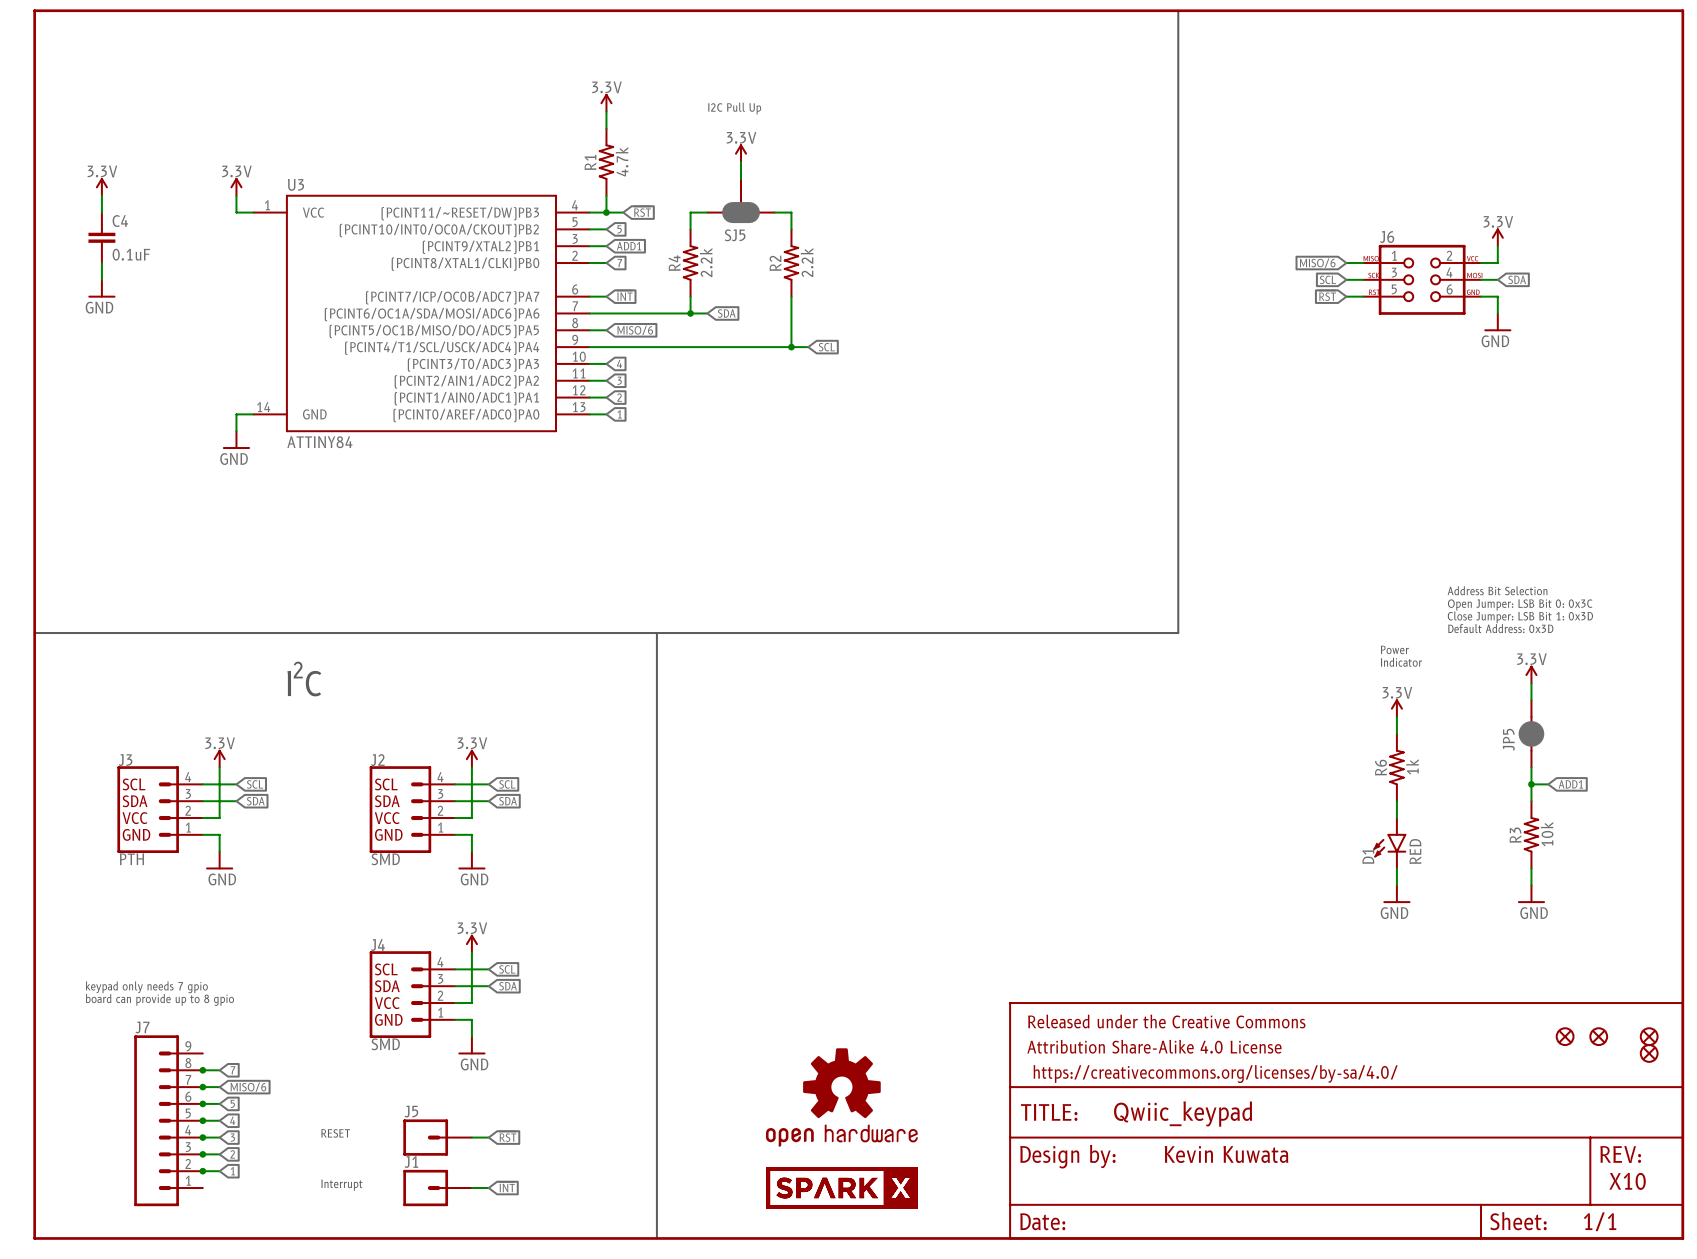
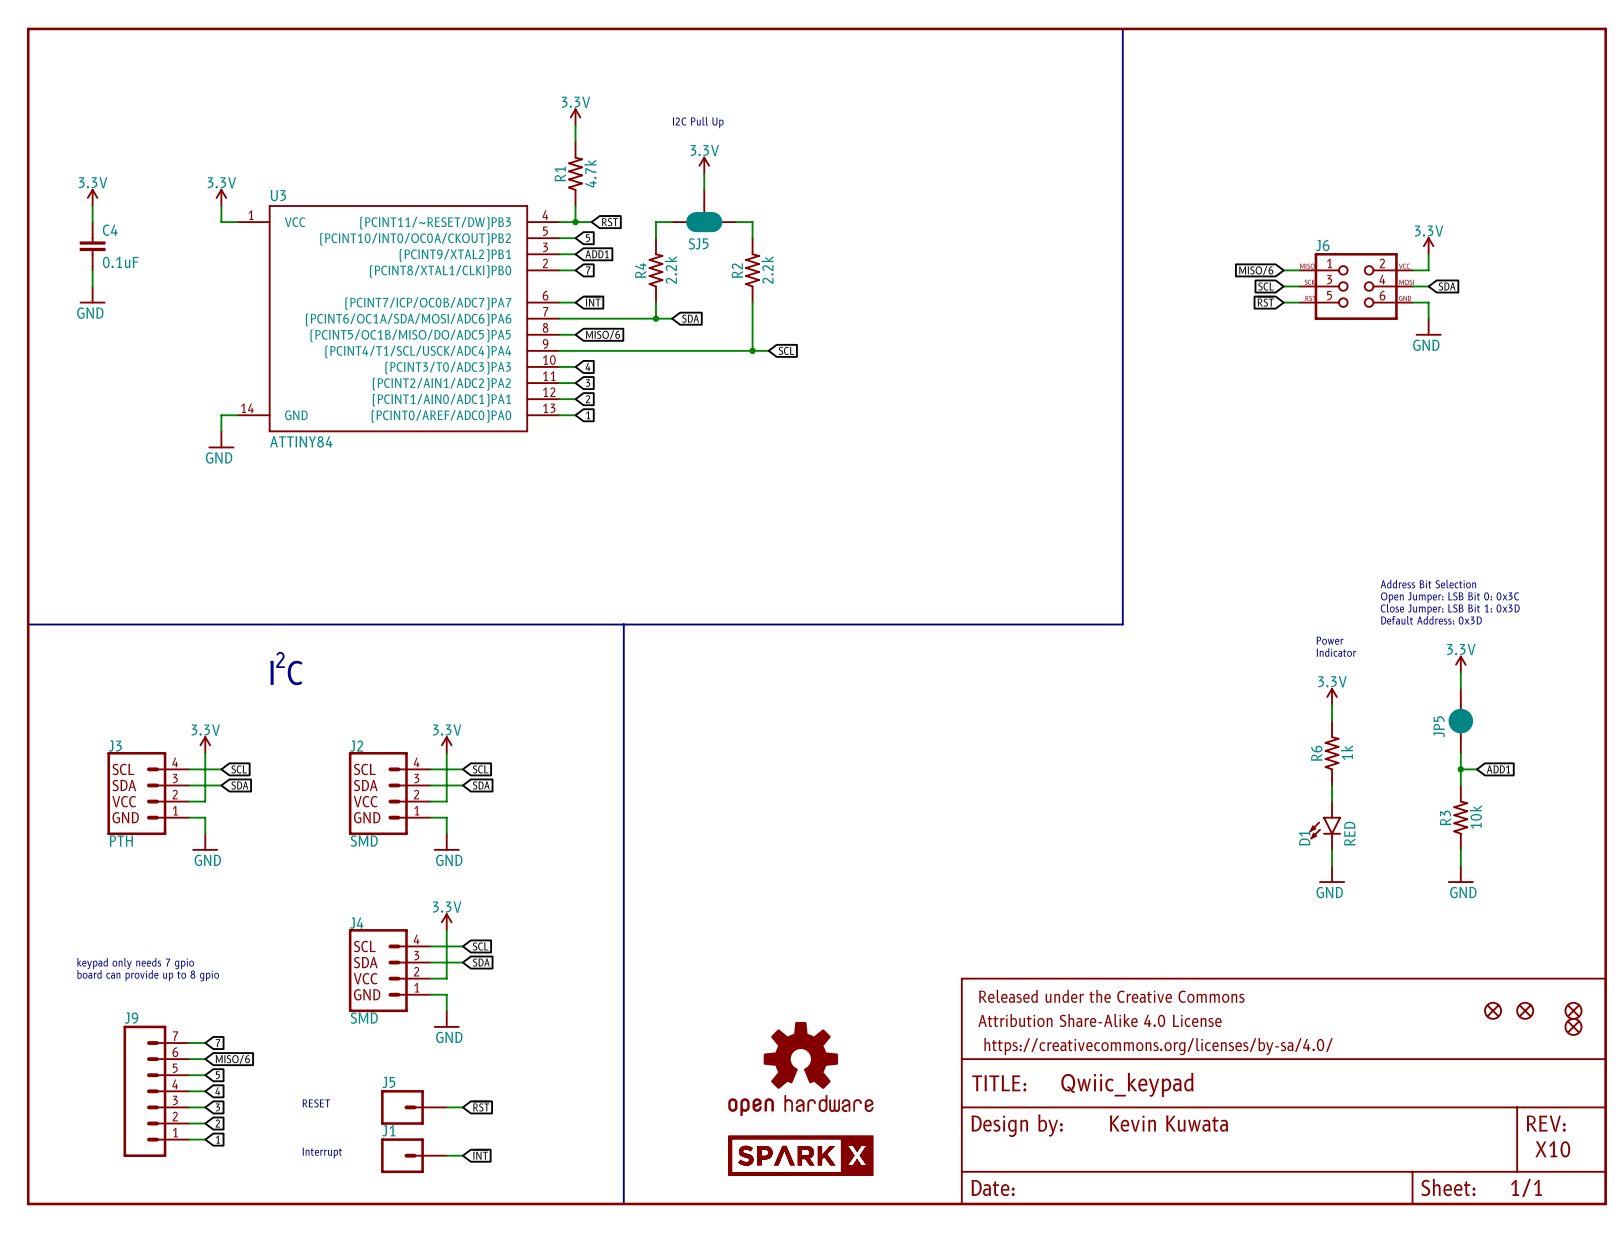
junction: (202, 1070) -> none
junction: (202, 1087) -> none
junction: (202, 1103) -> none
J7: (168, 1120) -> none
J9: none -> (156, 1091)
junction: (202, 1120) -> none
junction: (202, 1137) -> none
junction: (202, 1154) -> none
junction: (202, 1171) -> none

